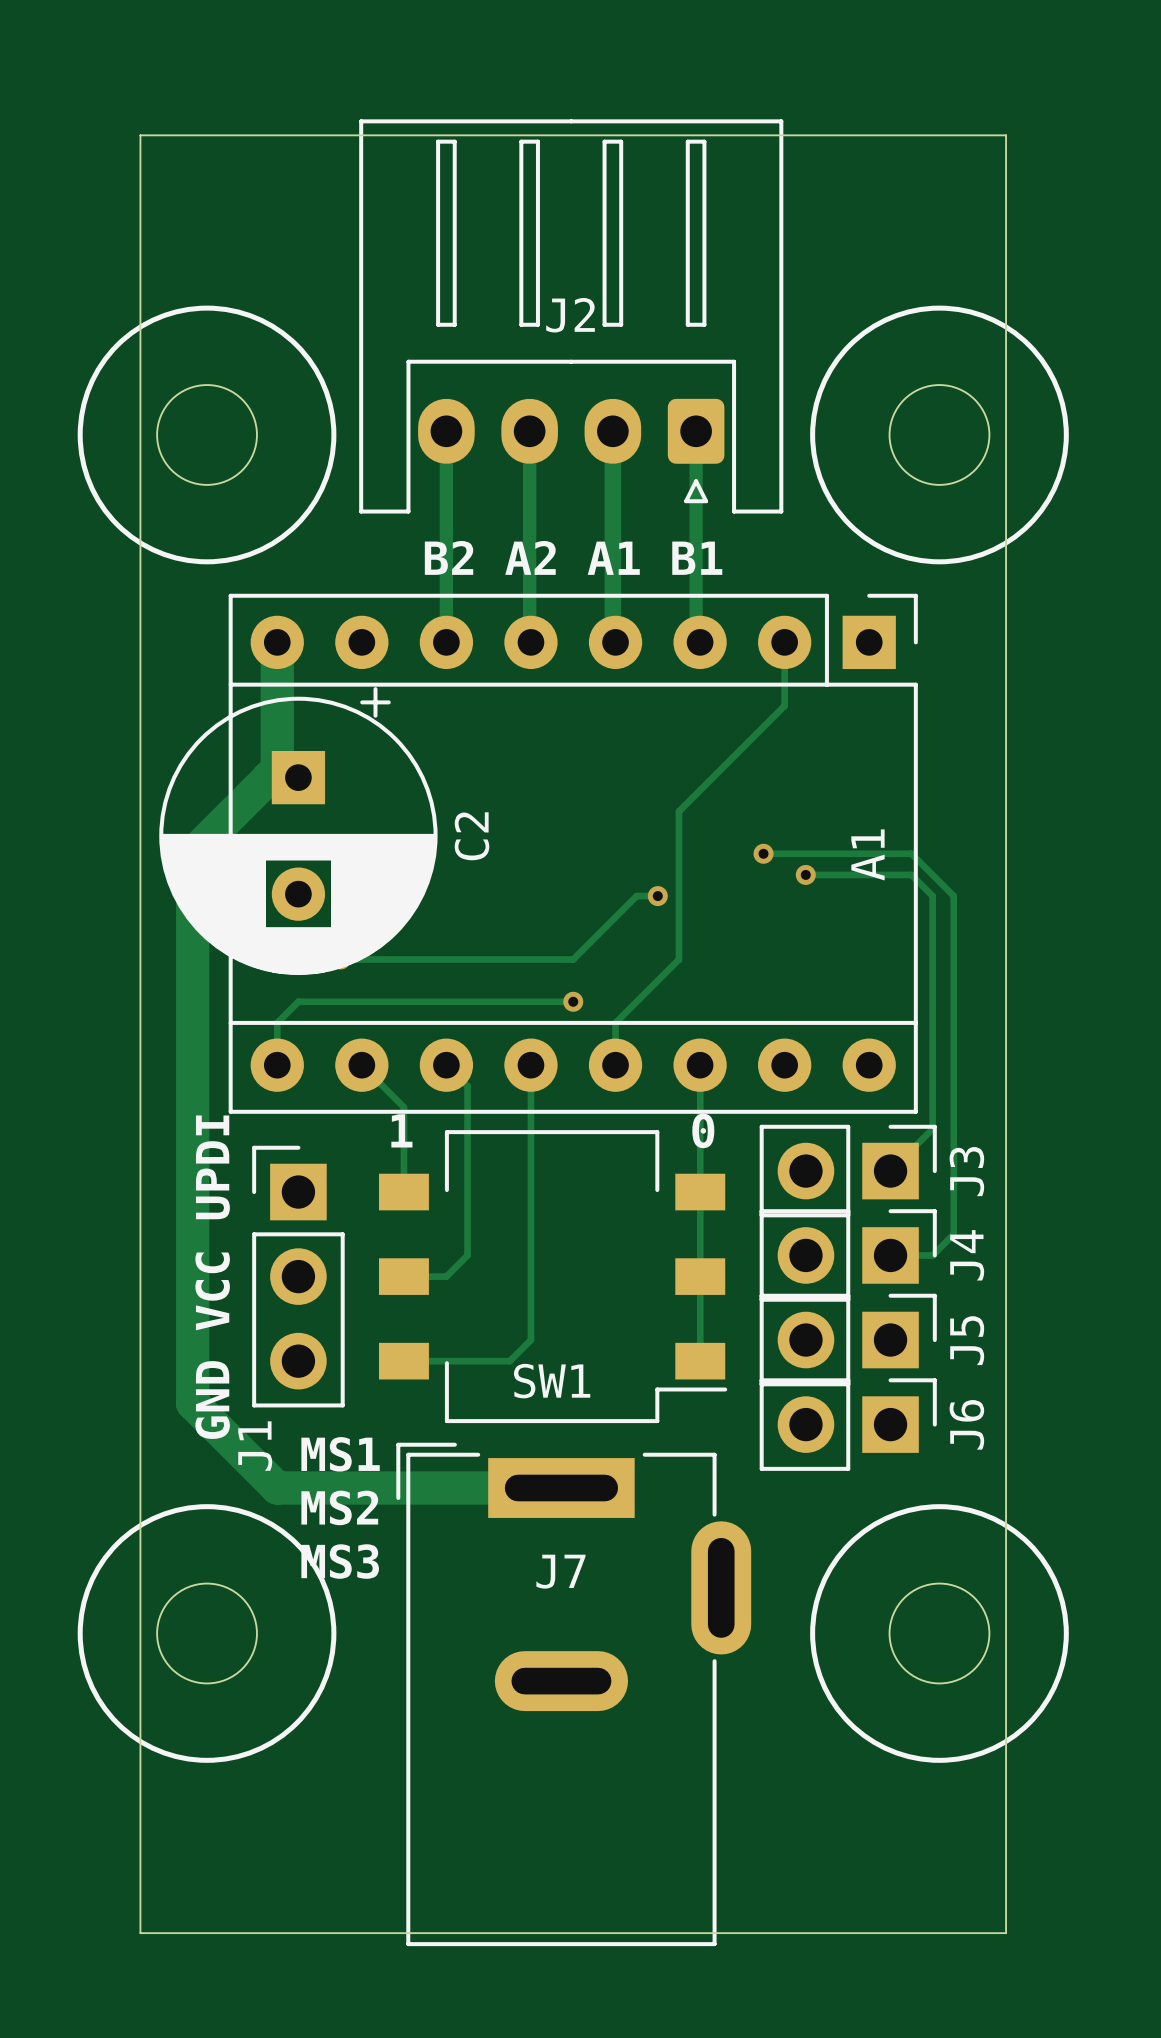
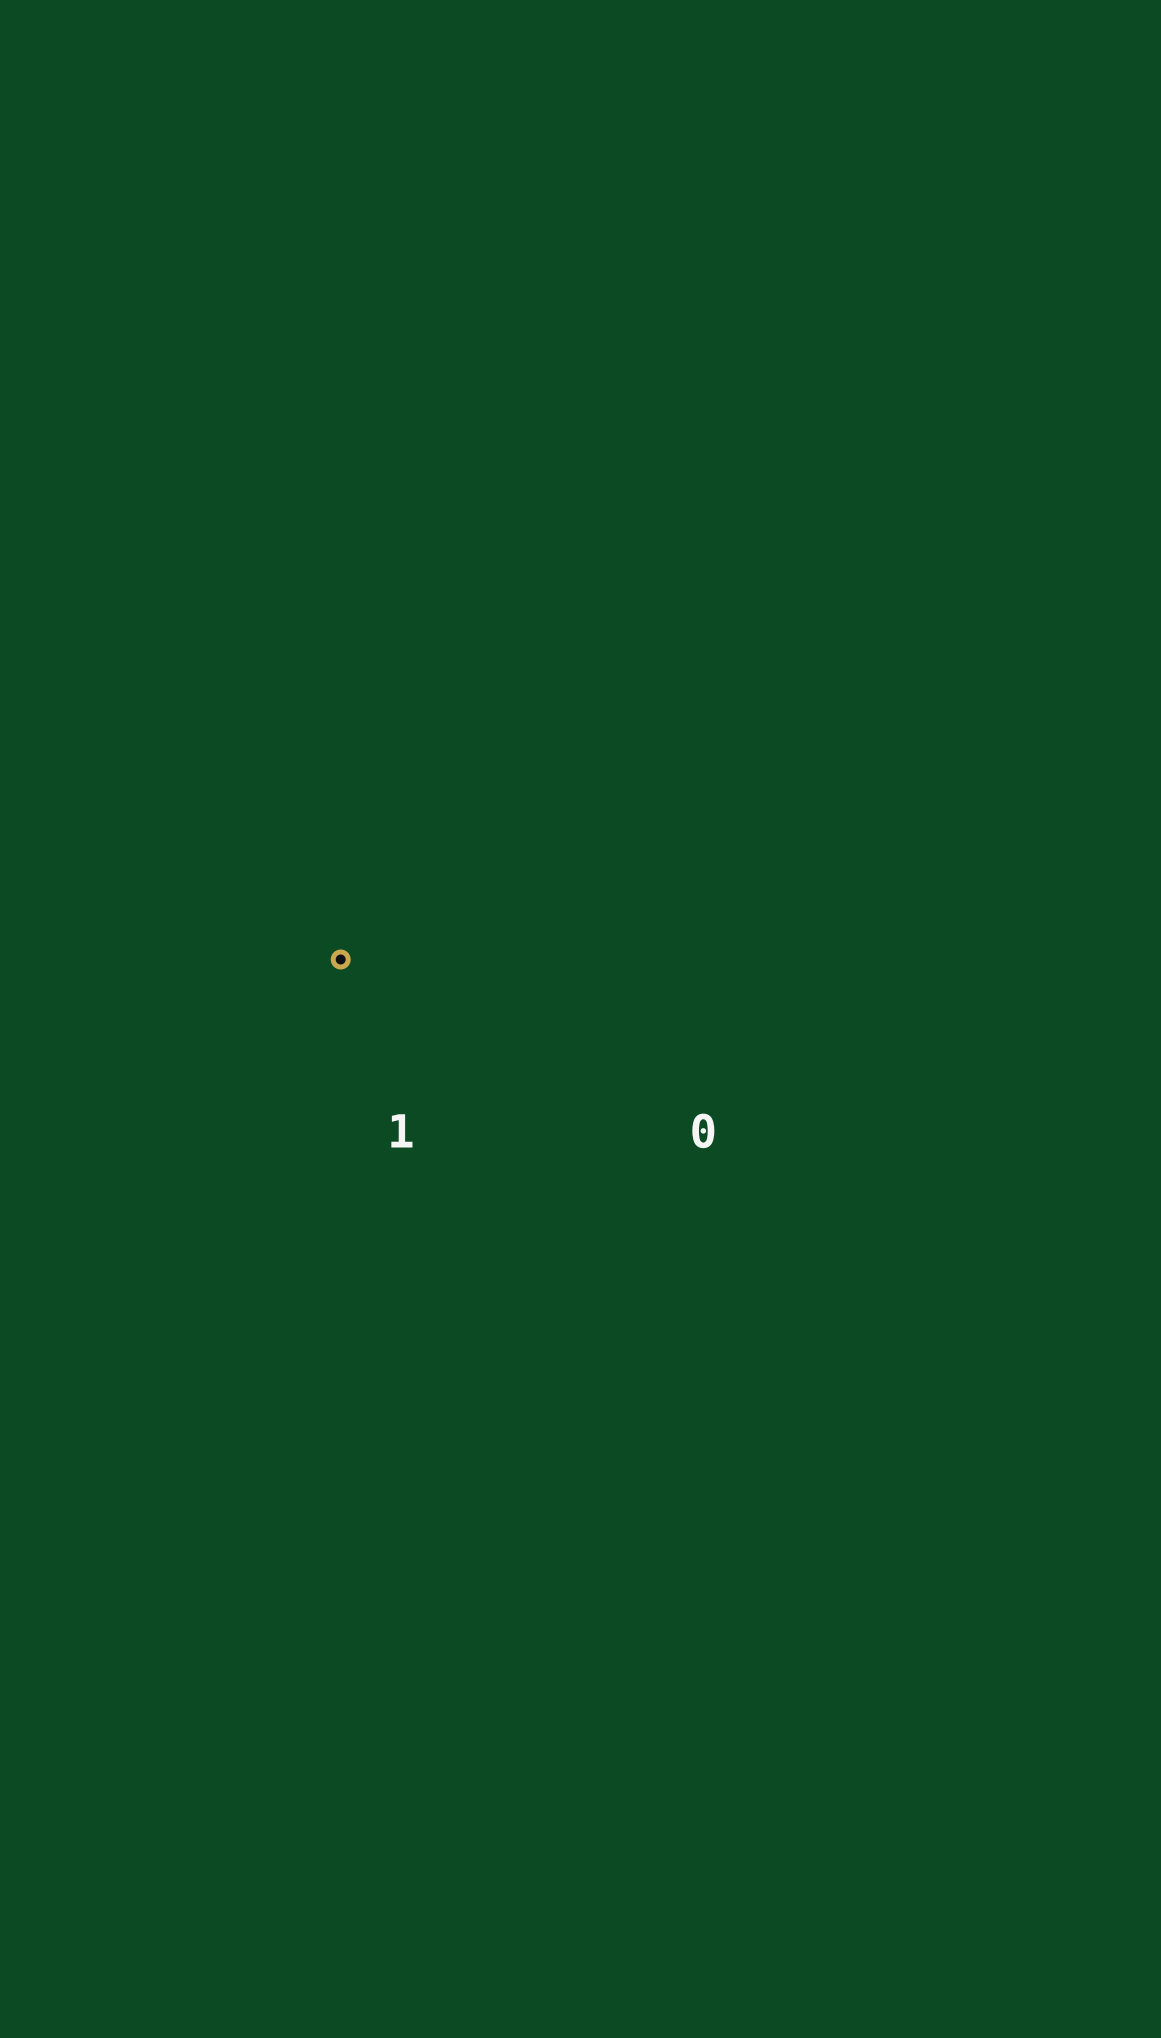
board edge: (140, 135) (1006, 135) (1006, 1933) (140, 1933) (140, 135) -> none
drawing: [77, 305, 337, 565] -> none
drawing: [810, 305, 1069, 565] -> none
J2: (571, 316) -> none
round board edge: [156, 384, 258, 486] -> none
round board edge: [888, 384, 991, 486] -> none
track: (446, 431) (446, 642) -> none
track: (529, 431) (530, 642) -> none
track: (612, 431) (612, 640) (615, 642) -> none
track: (696, 431) (696, 638) (700, 642) -> none
text: B2 A2 A1 B1 (573, 557) -> none
track: (277, 642) (277, 769) (192, 853) (192, 1403) (277, 1488) (561, 1488) -> none
track: (784, 642) (784, 705) (678, 811) (678, 959) (615, 1022) (615, 1065) -> none
C2: (298, 831) -> none
A1: (573, 853) -> none
track: (763, 853) (911, 853) (953, 896) (953, 1234) (932, 1255) (890, 1255) -> none
via: (763, 853) -> none
track: (805, 874) (911, 874) (932, 896) (932, 1128) (890, 1171) -> none
via: (805, 874) -> none
track: (657, 896) (636, 896) (573, 959) (340, 959) -> none
via: (657, 896) -> none
track: (573, 1001) (298, 1001) (277, 1022) (277, 1065) -> none
via: (573, 1001) -> none
track: (361, 1065) (403, 1107) (403, 1192) -> none
track: (446, 1065) (467, 1086) (467, 1255) (446, 1276) (403, 1276) -> none
track: (530, 1065) (530, 1340) (509, 1361) (403, 1361) -> none
track: (700, 1065) (700, 1361) -> none
J3: (848, 1171) -> none
J4: (848, 1255) -> none
J1: (298, 1276) -> none
SW1: (553, 1276) -> none
text: GND VCC UPDI (212, 1277) -> none
J5: (848, 1340) -> none
J6: (848, 1424) -> none
text: MS1 (340, 1454) -> none
drawing: [77, 1504, 337, 1763] -> none
drawing: [810, 1504, 1069, 1763] -> none
text: MS2 (339, 1507) -> none
text: MS3 (340, 1561) -> none
round board edge: [156, 1582, 258, 1685] -> none
round board edge: [888, 1582, 991, 1685] -> none
J7: (573, 1694) -> none

